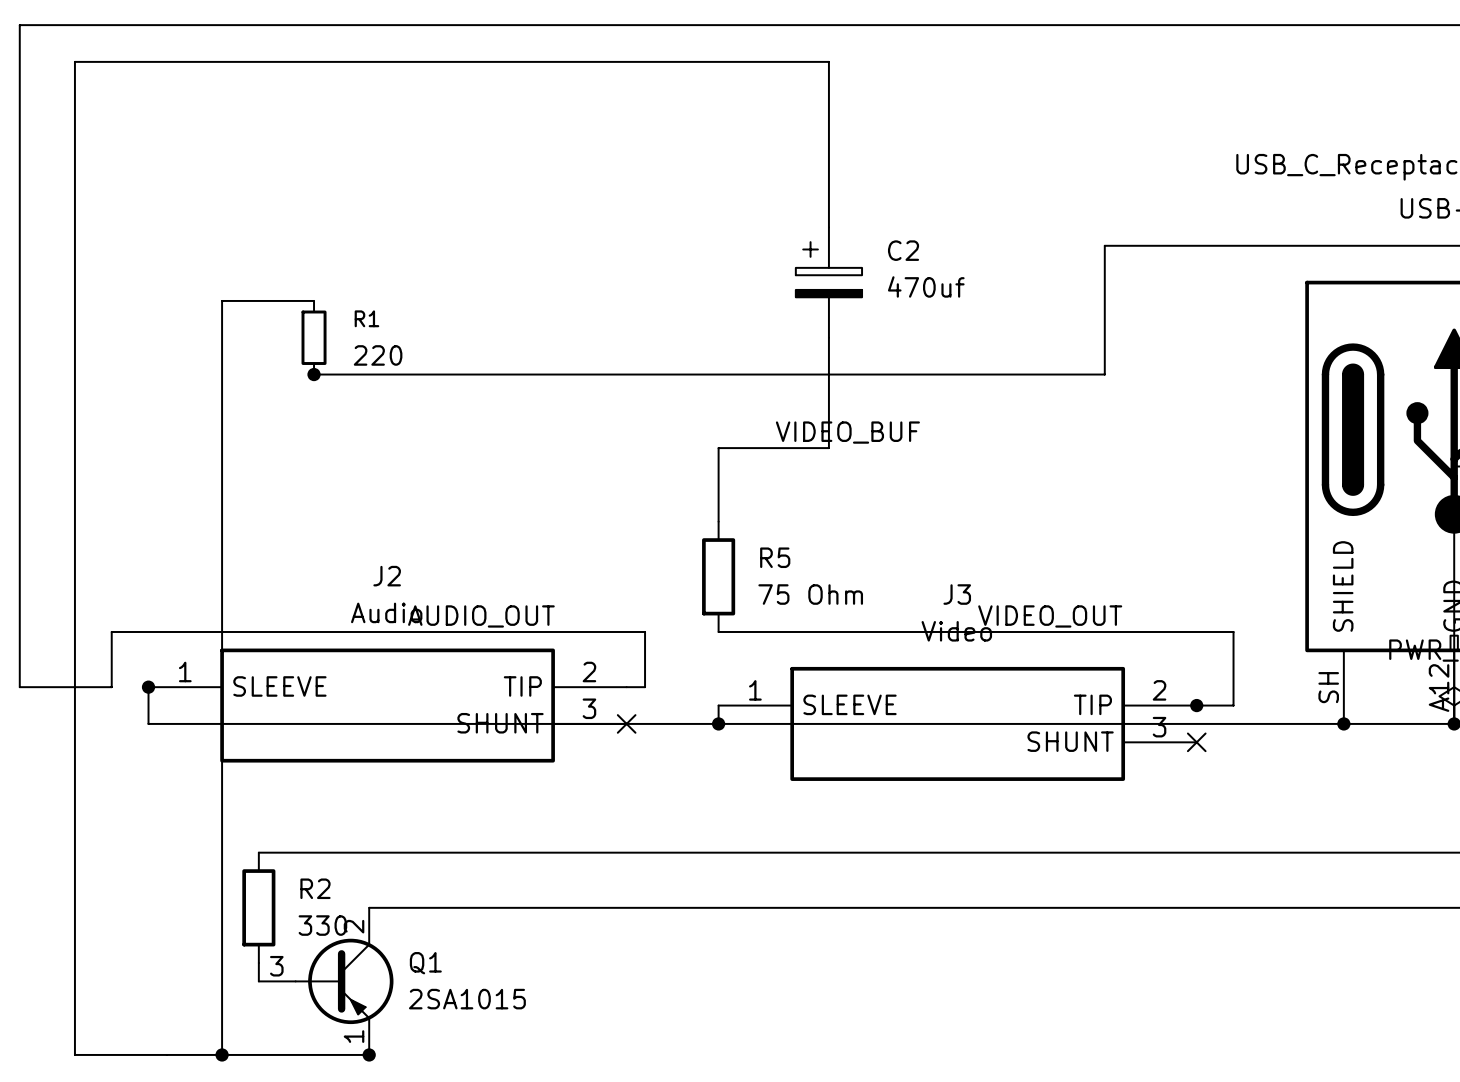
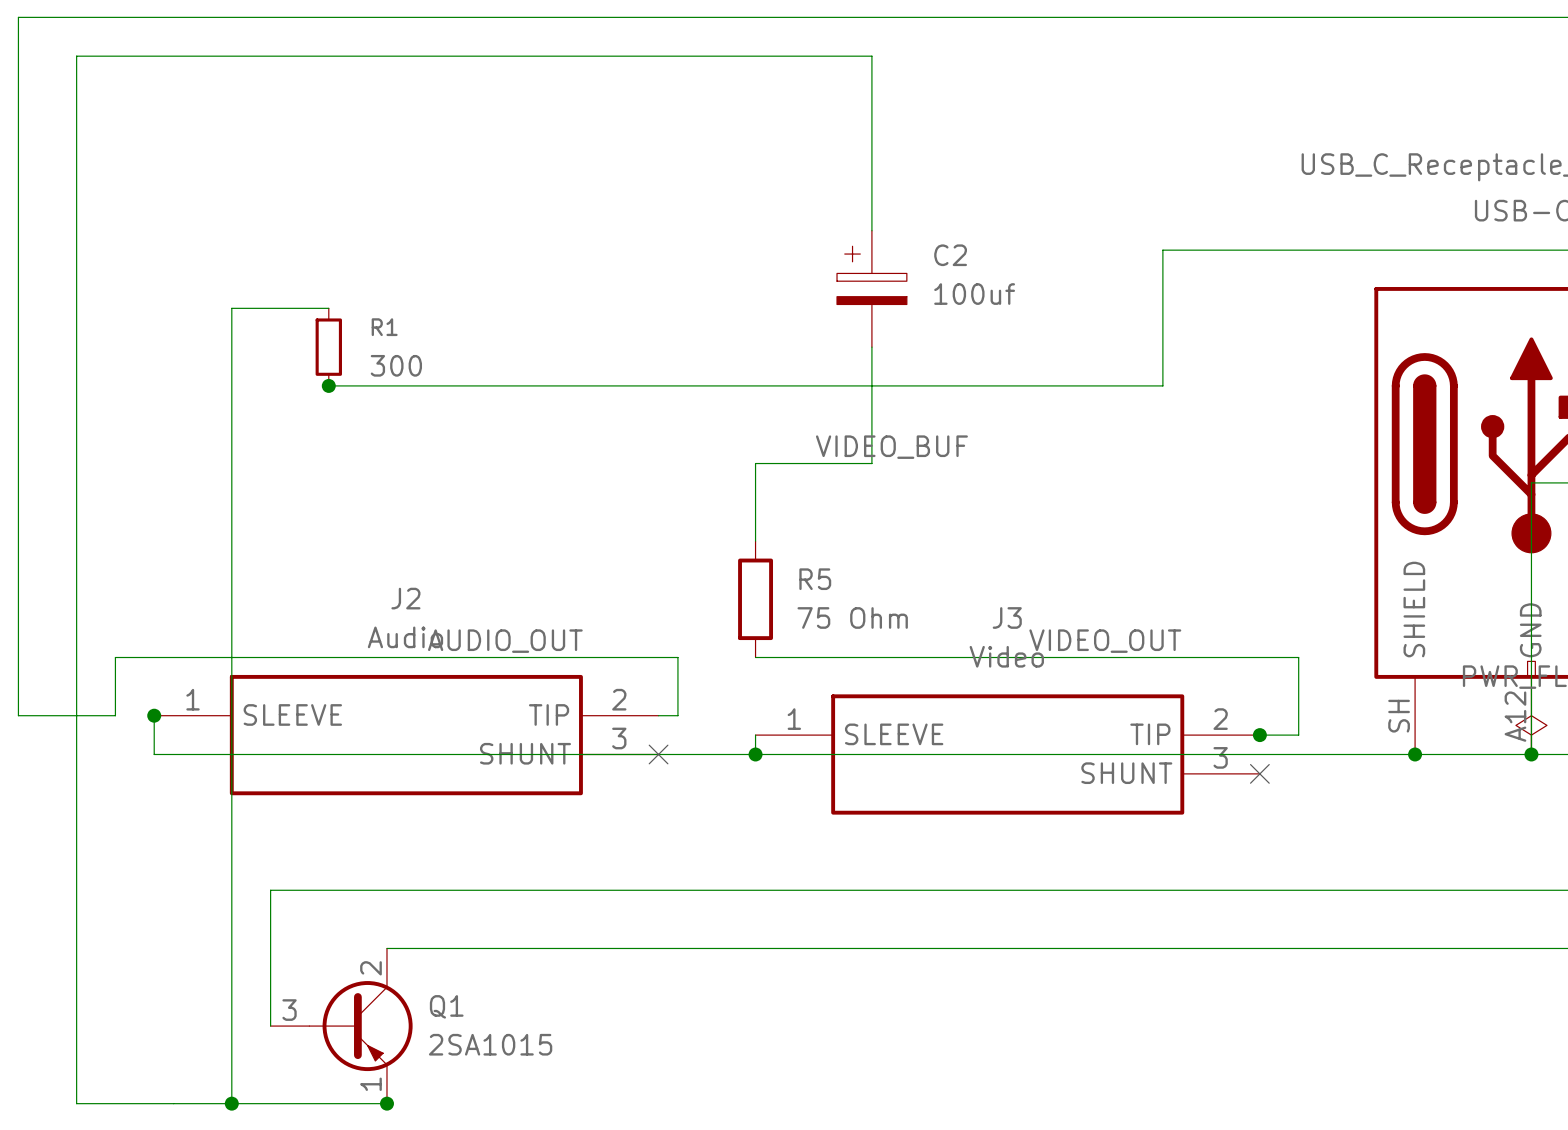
C2 value: 470uf (926, 286) -> 100uf (974, 294)
R1 value: 220 (378, 355) -> 300 (396, 365)
wire: none -> (270, 890) (270, 1006)
R2: 330 (258, 907) -> none

